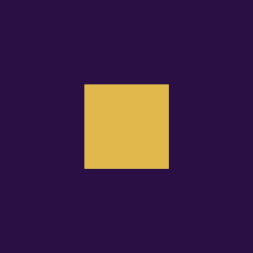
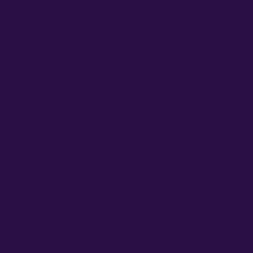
part: (126, 126) -> none

